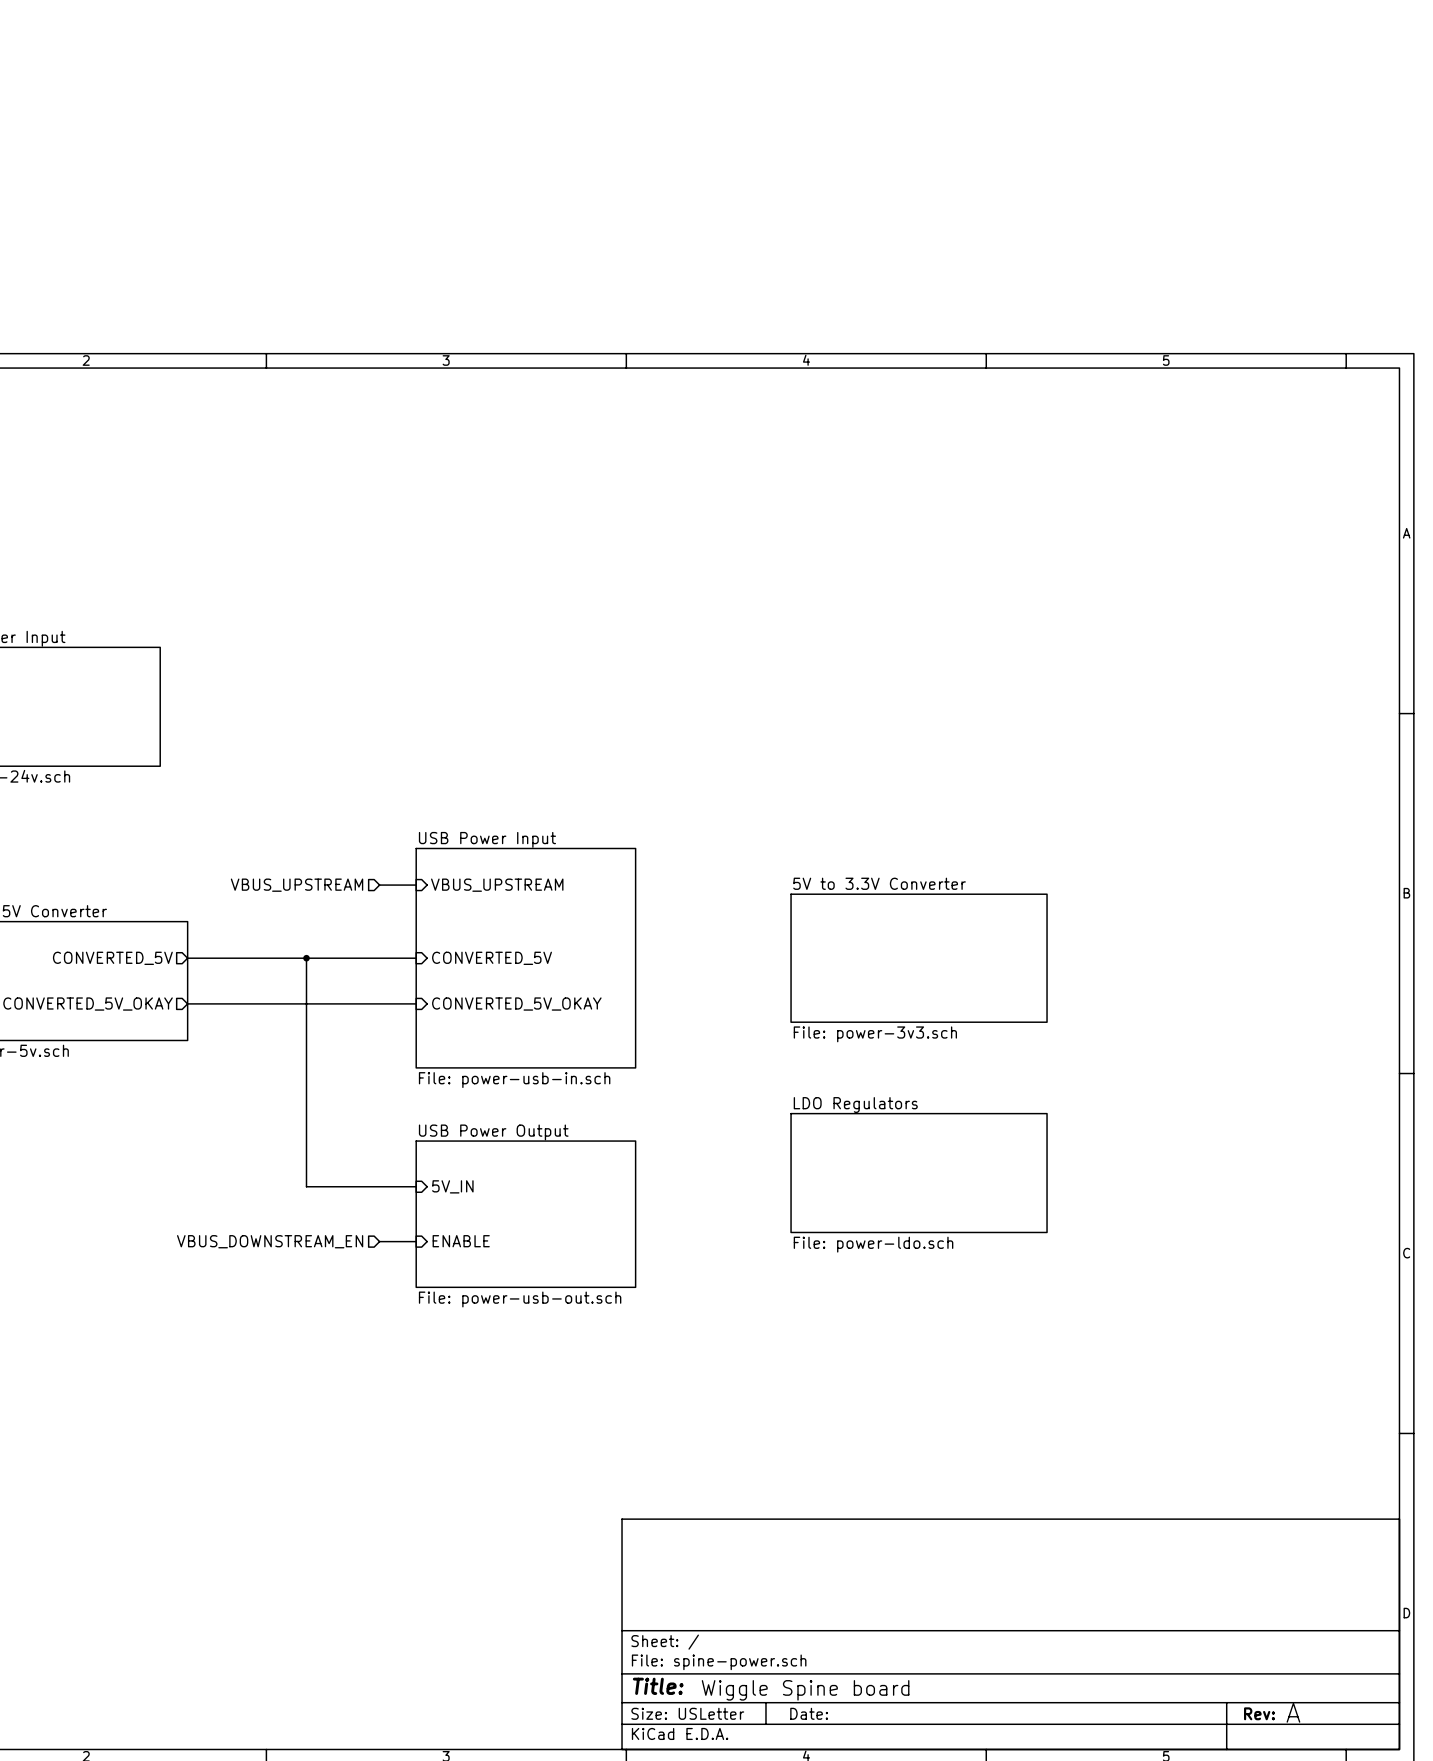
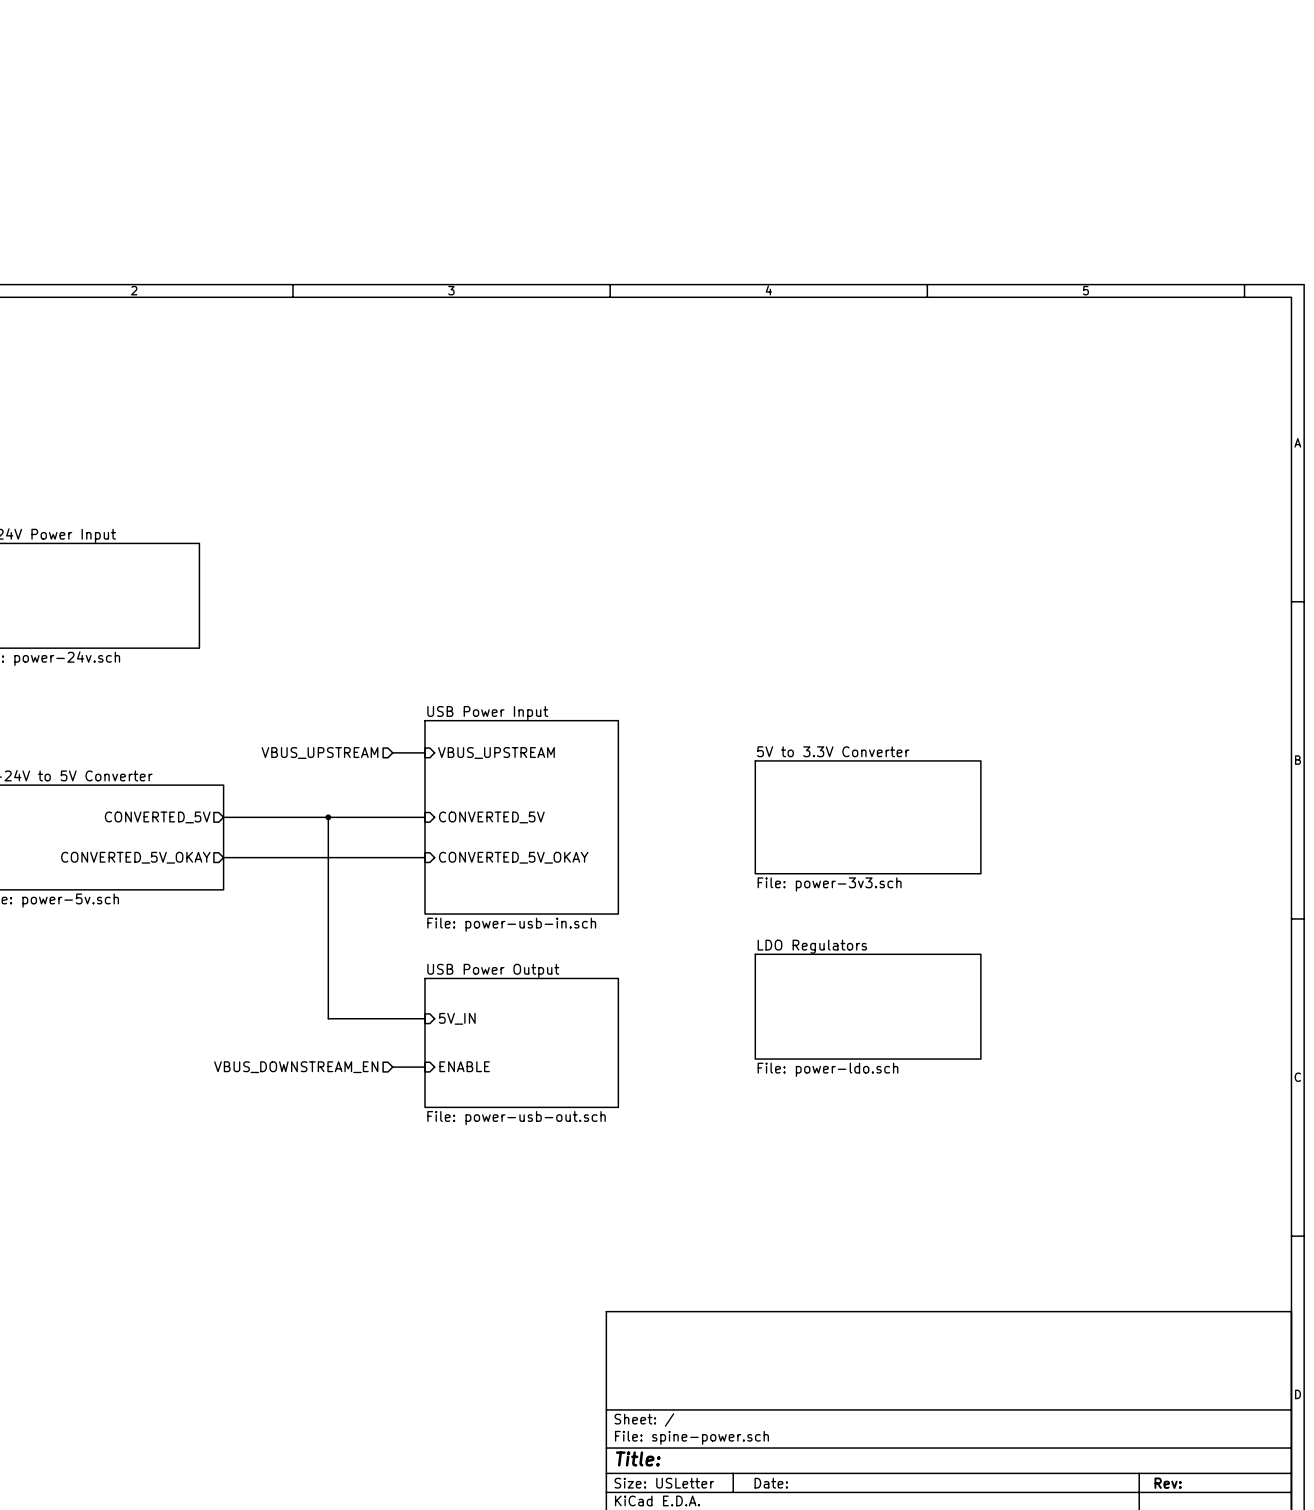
text: Wiggle Spine board (805, 1690) -> none
text: A (1293, 1712) -> none

